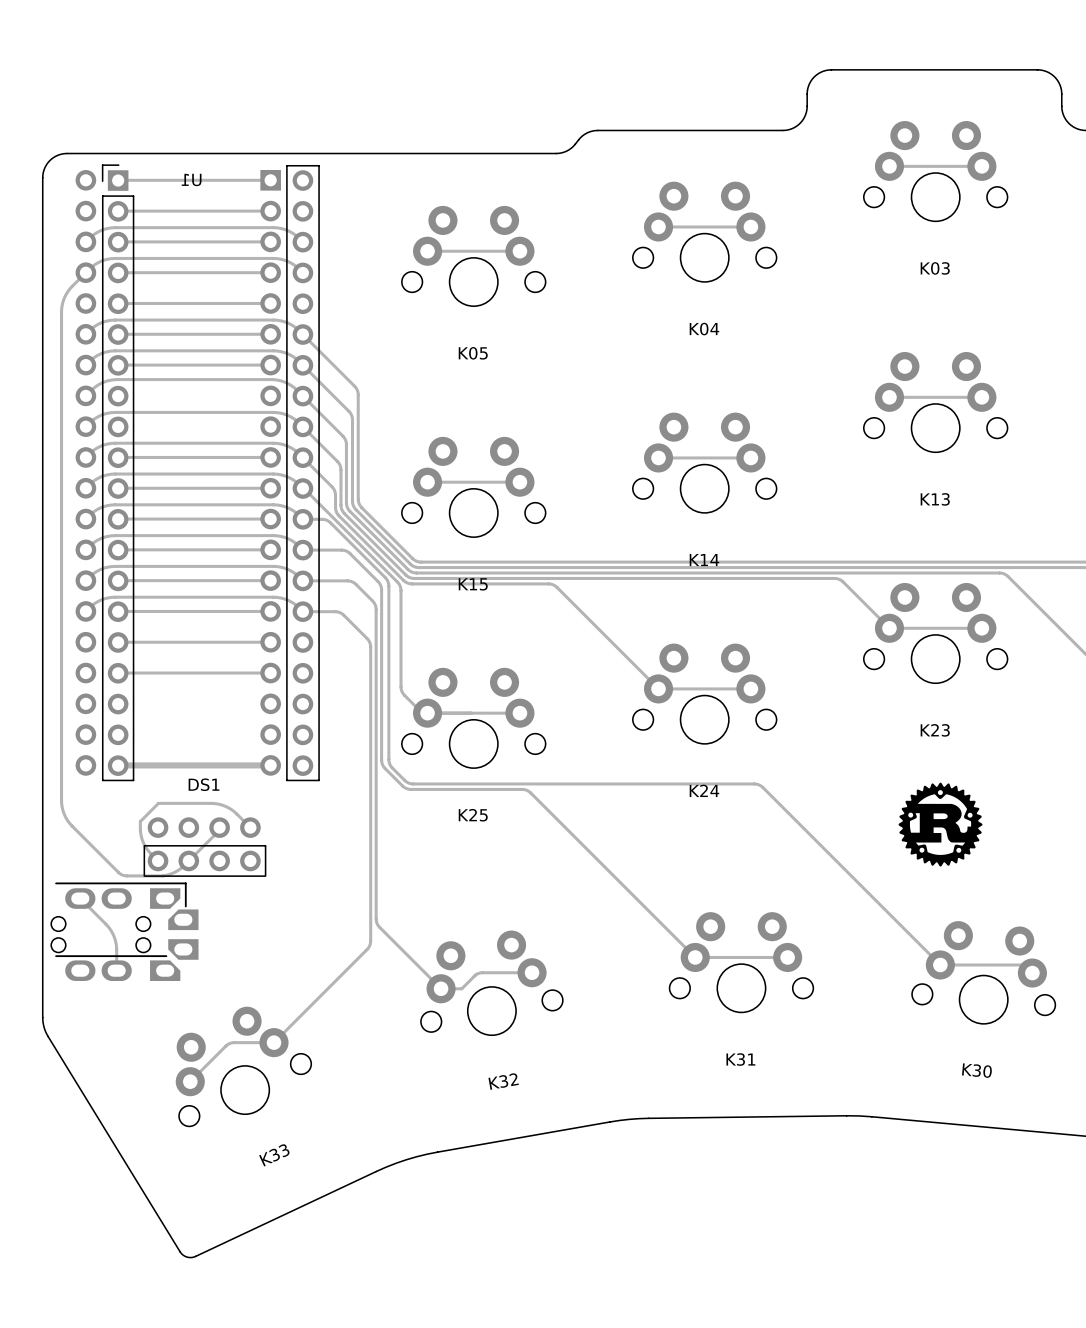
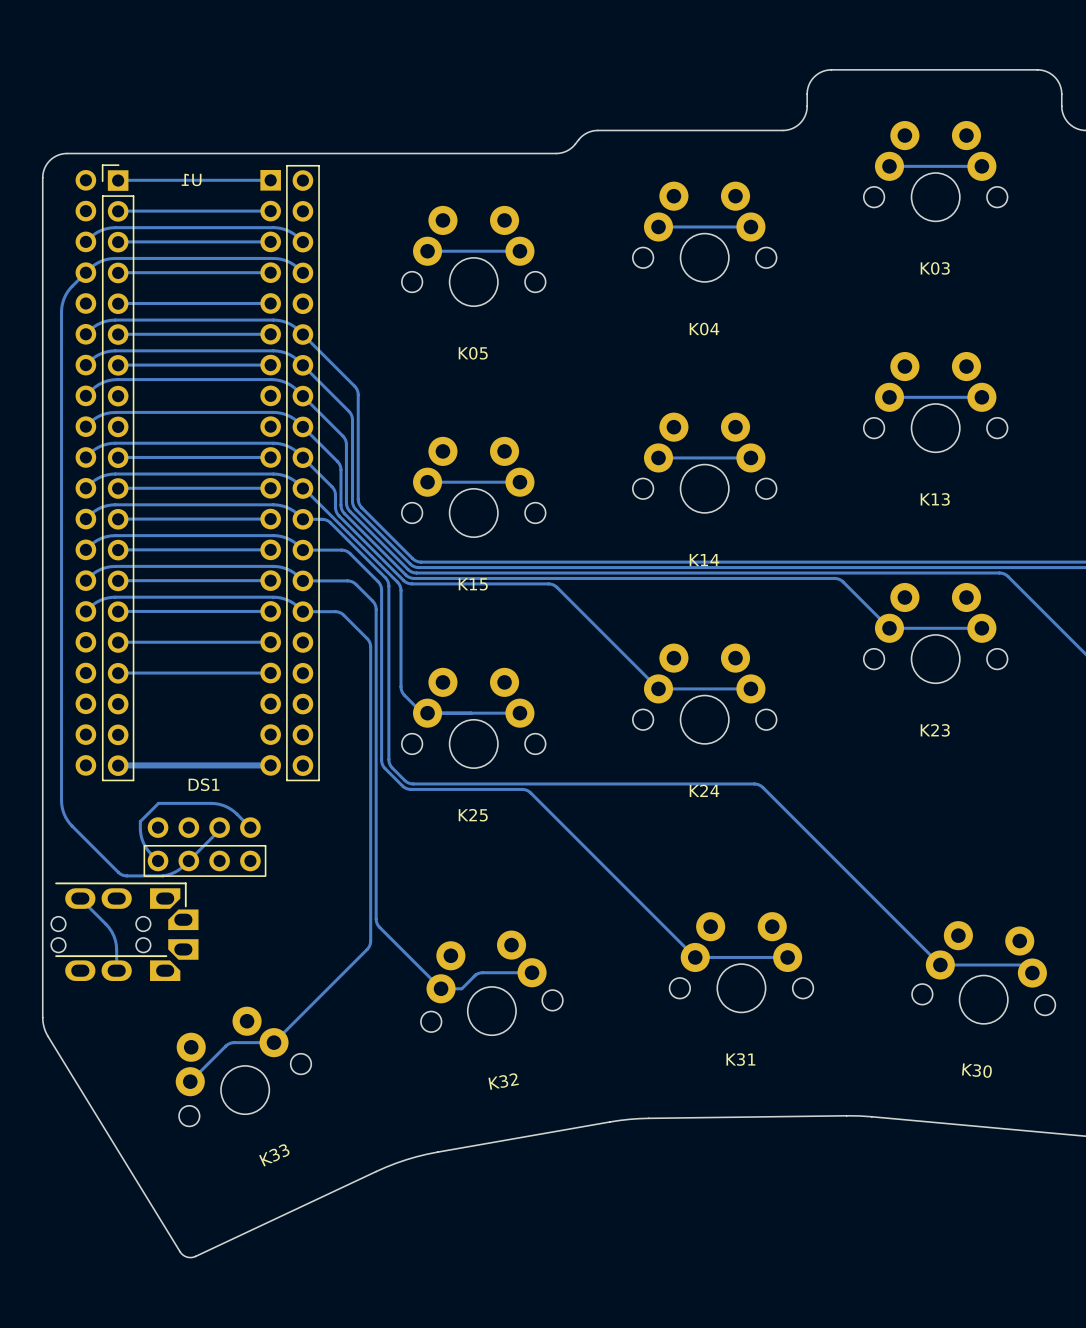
drawing: [898, 782, 983, 867] -> none

